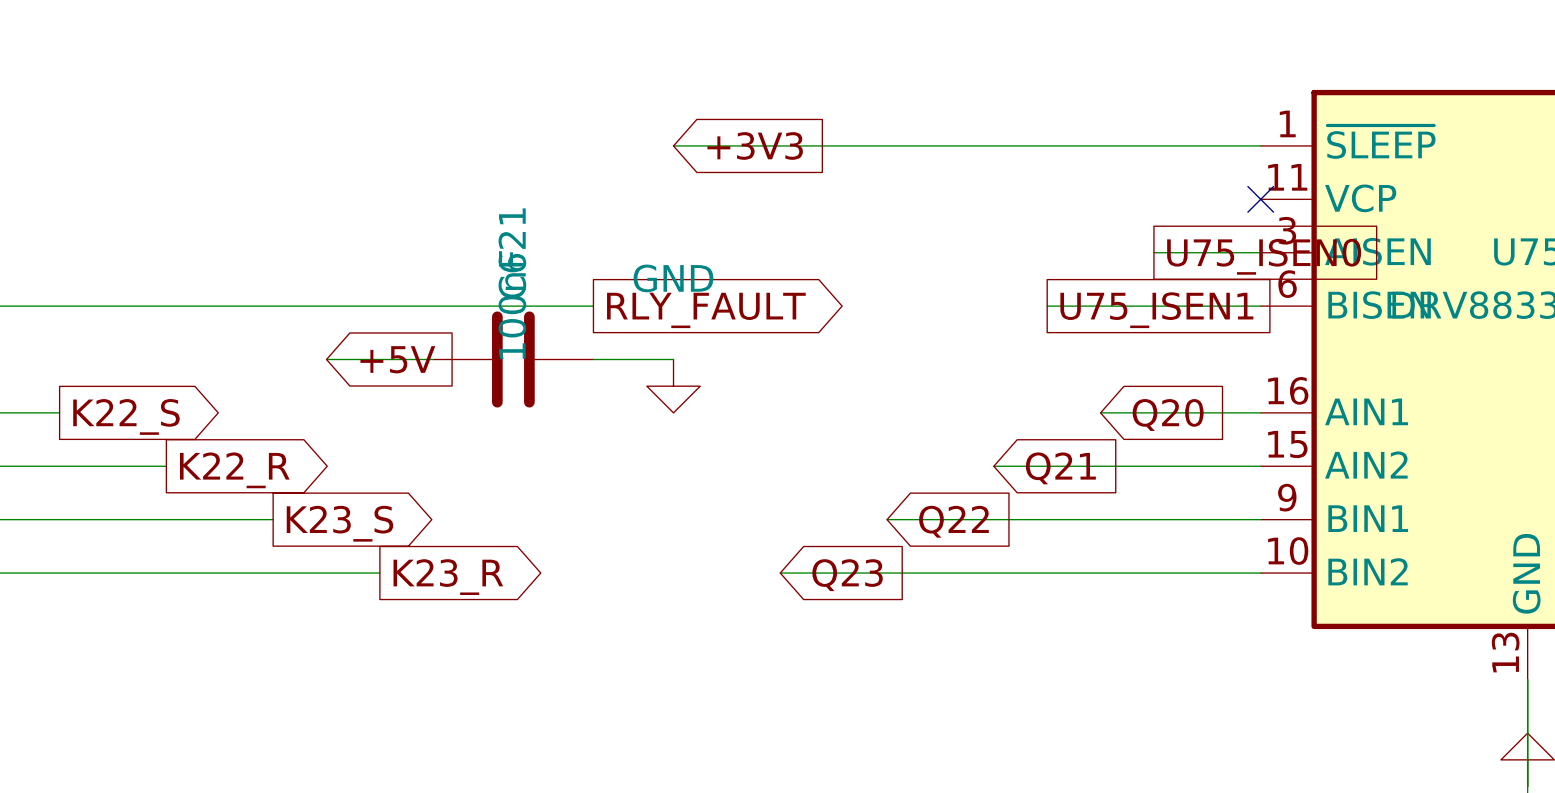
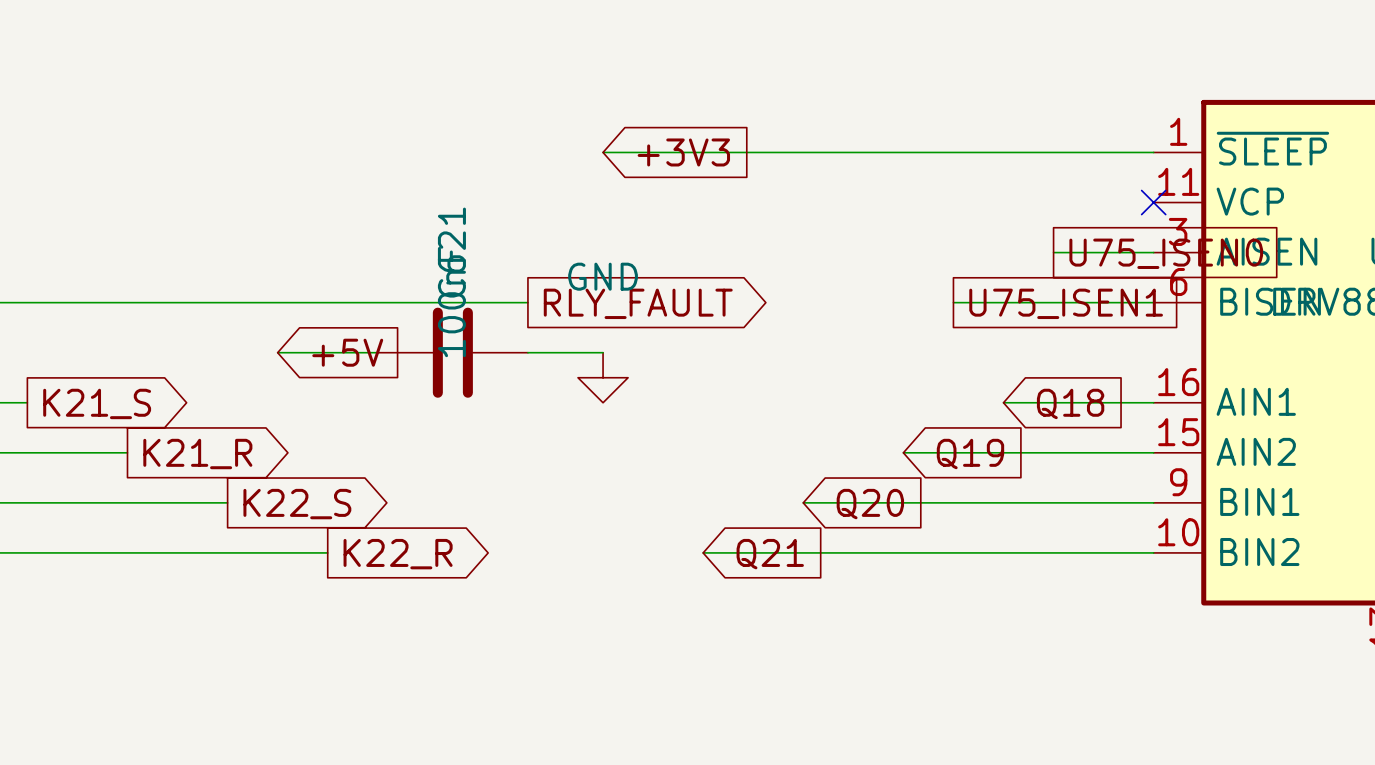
global label: Q20 (1168, 415) -> Q18 (1070, 403)
global label: K22_S (126, 416) -> K21_S (97, 403)
global label: Q21 (1060, 468) -> Q19 (970, 454)
global label: K22_R (234, 470) -> K21_R (197, 454)
global label: Q22 (953, 521) -> Q20 (870, 504)
global label: K23_S (339, 523) -> K22_S (297, 504)
global label: Q23 (847, 575) -> Q21 (770, 554)
global label: K23_R (448, 577) -> K22_R (398, 554)

